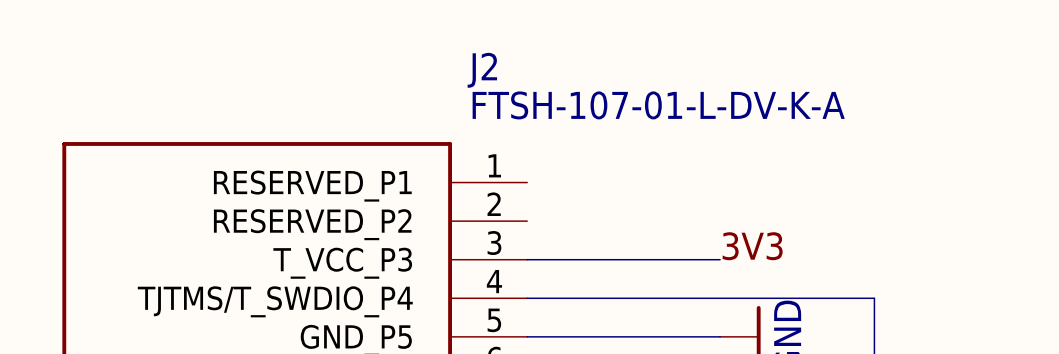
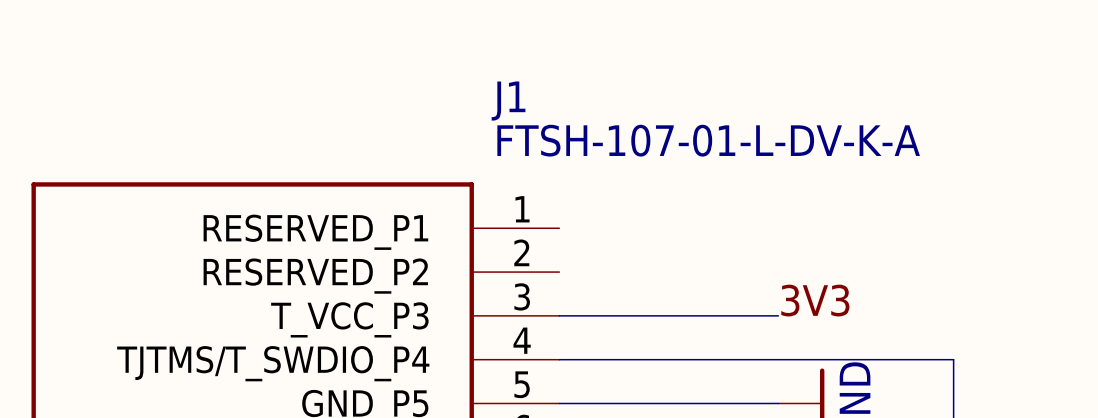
J2 name: J2 (482, 70) -> J1 (508, 101)

